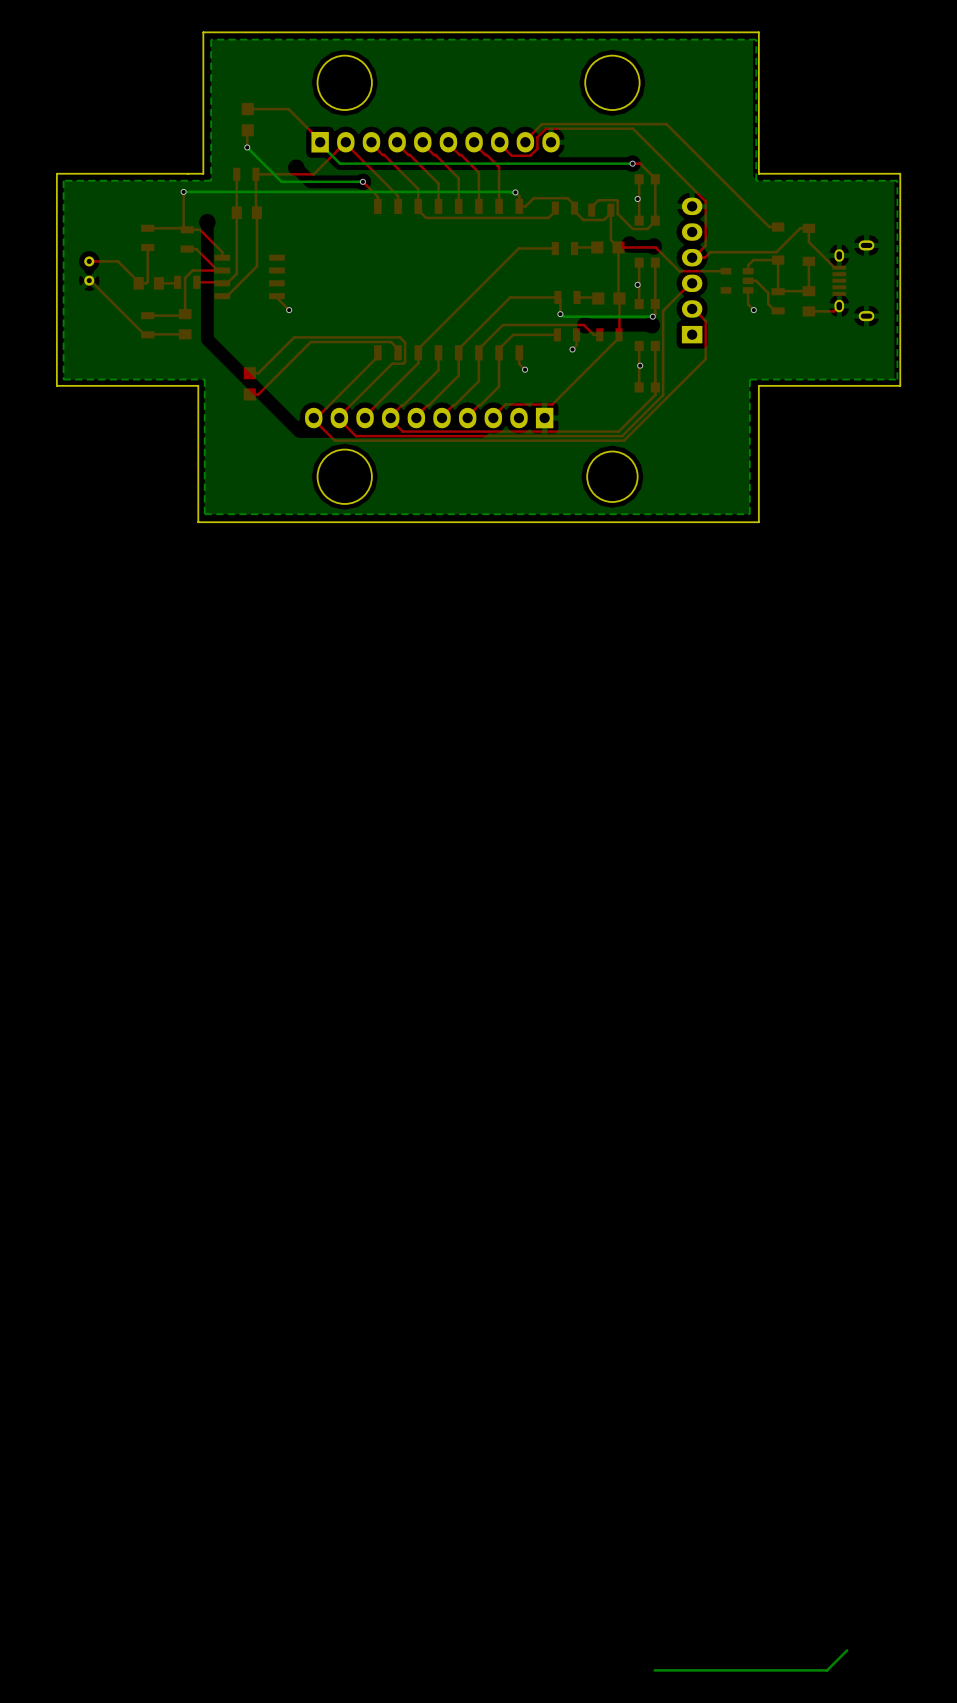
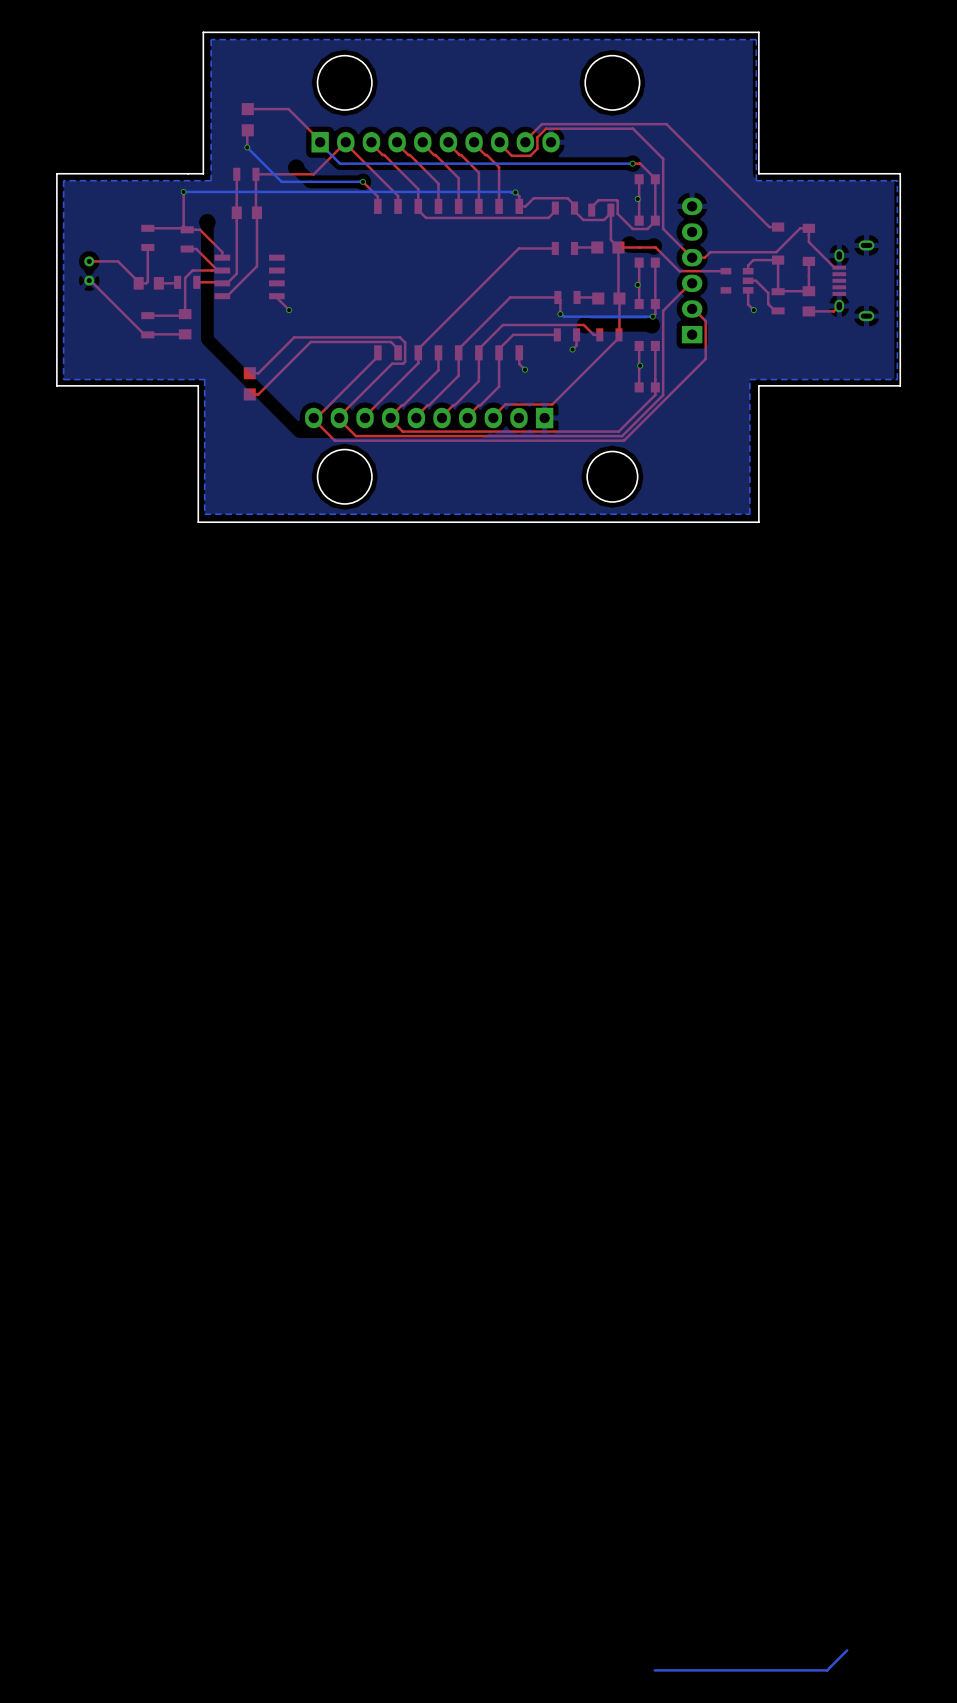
top track: (663, 158) (705, 201) (705, 245) (693, 257) -> (663, 158) (663, 228) (693, 257)

